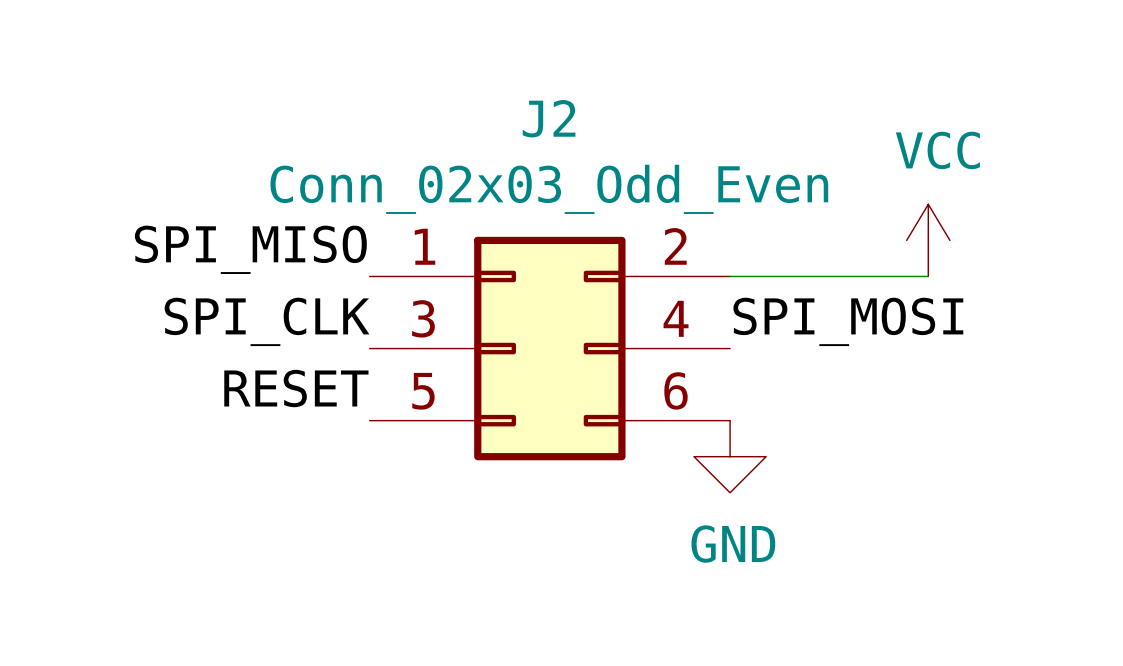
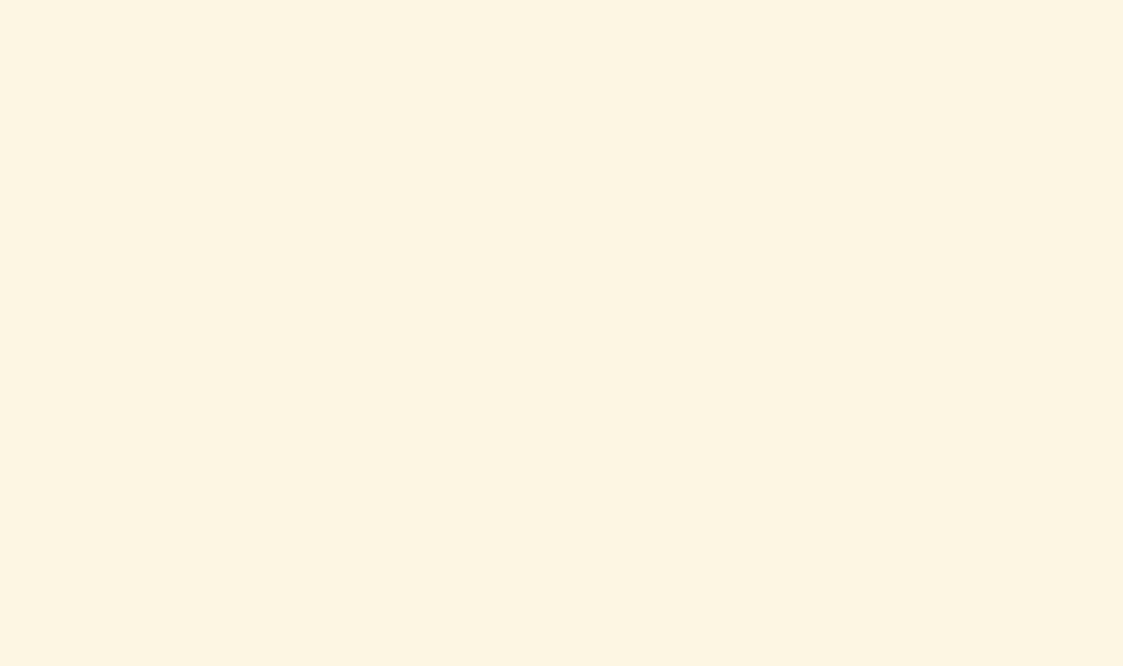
power symbol: VCC (928, 240) -> none
label: SPI_MISO (250, 249) -> none
wire: (730, 276) (928, 276) -> none
label: SPI_CLK (267, 321) -> none
label: SPI_MOSI (848, 321) -> none
J2: Conn_02x03_Odd_Even (549, 348) -> none
label: RESET (296, 388) -> none
power symbol: GND (730, 456) -> none

